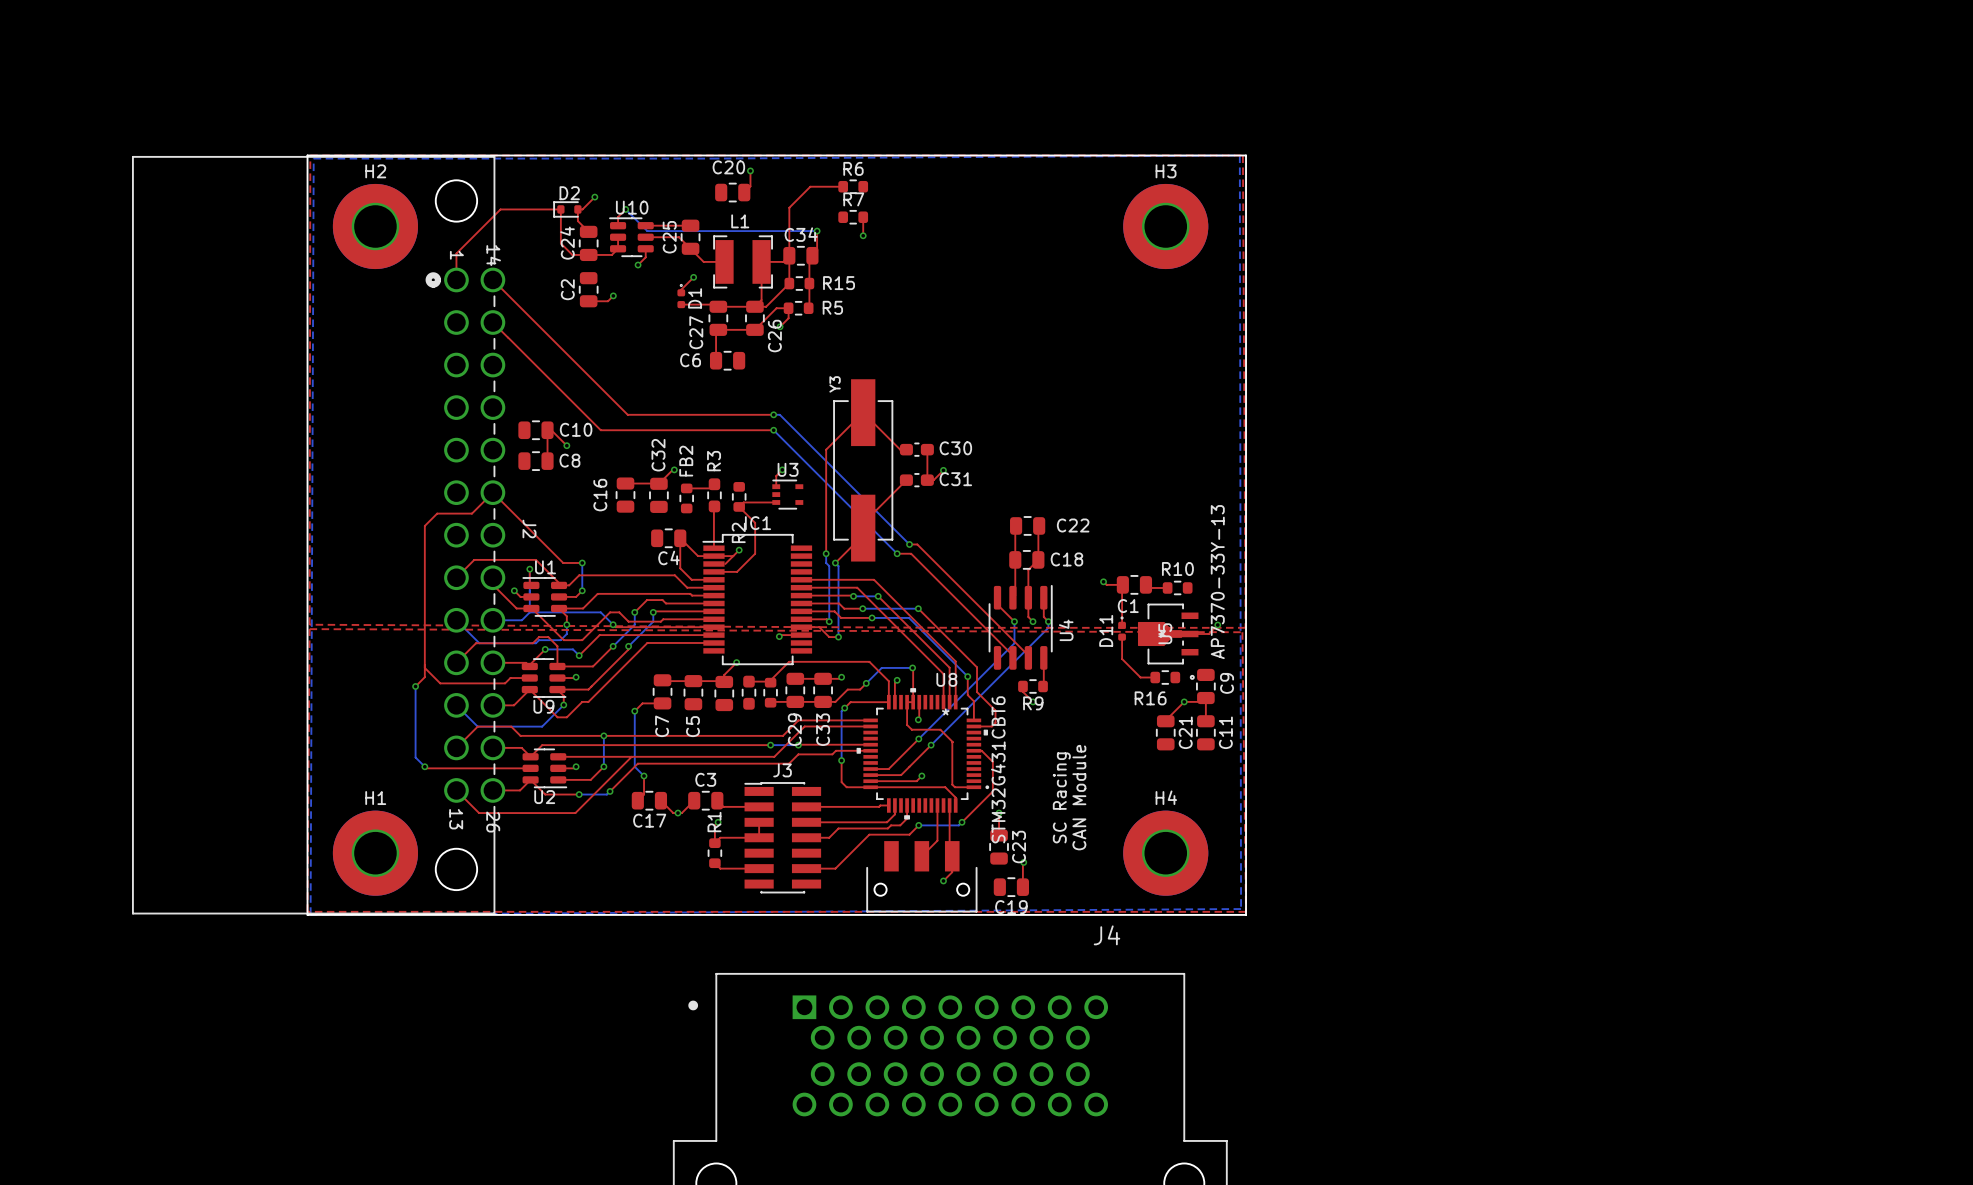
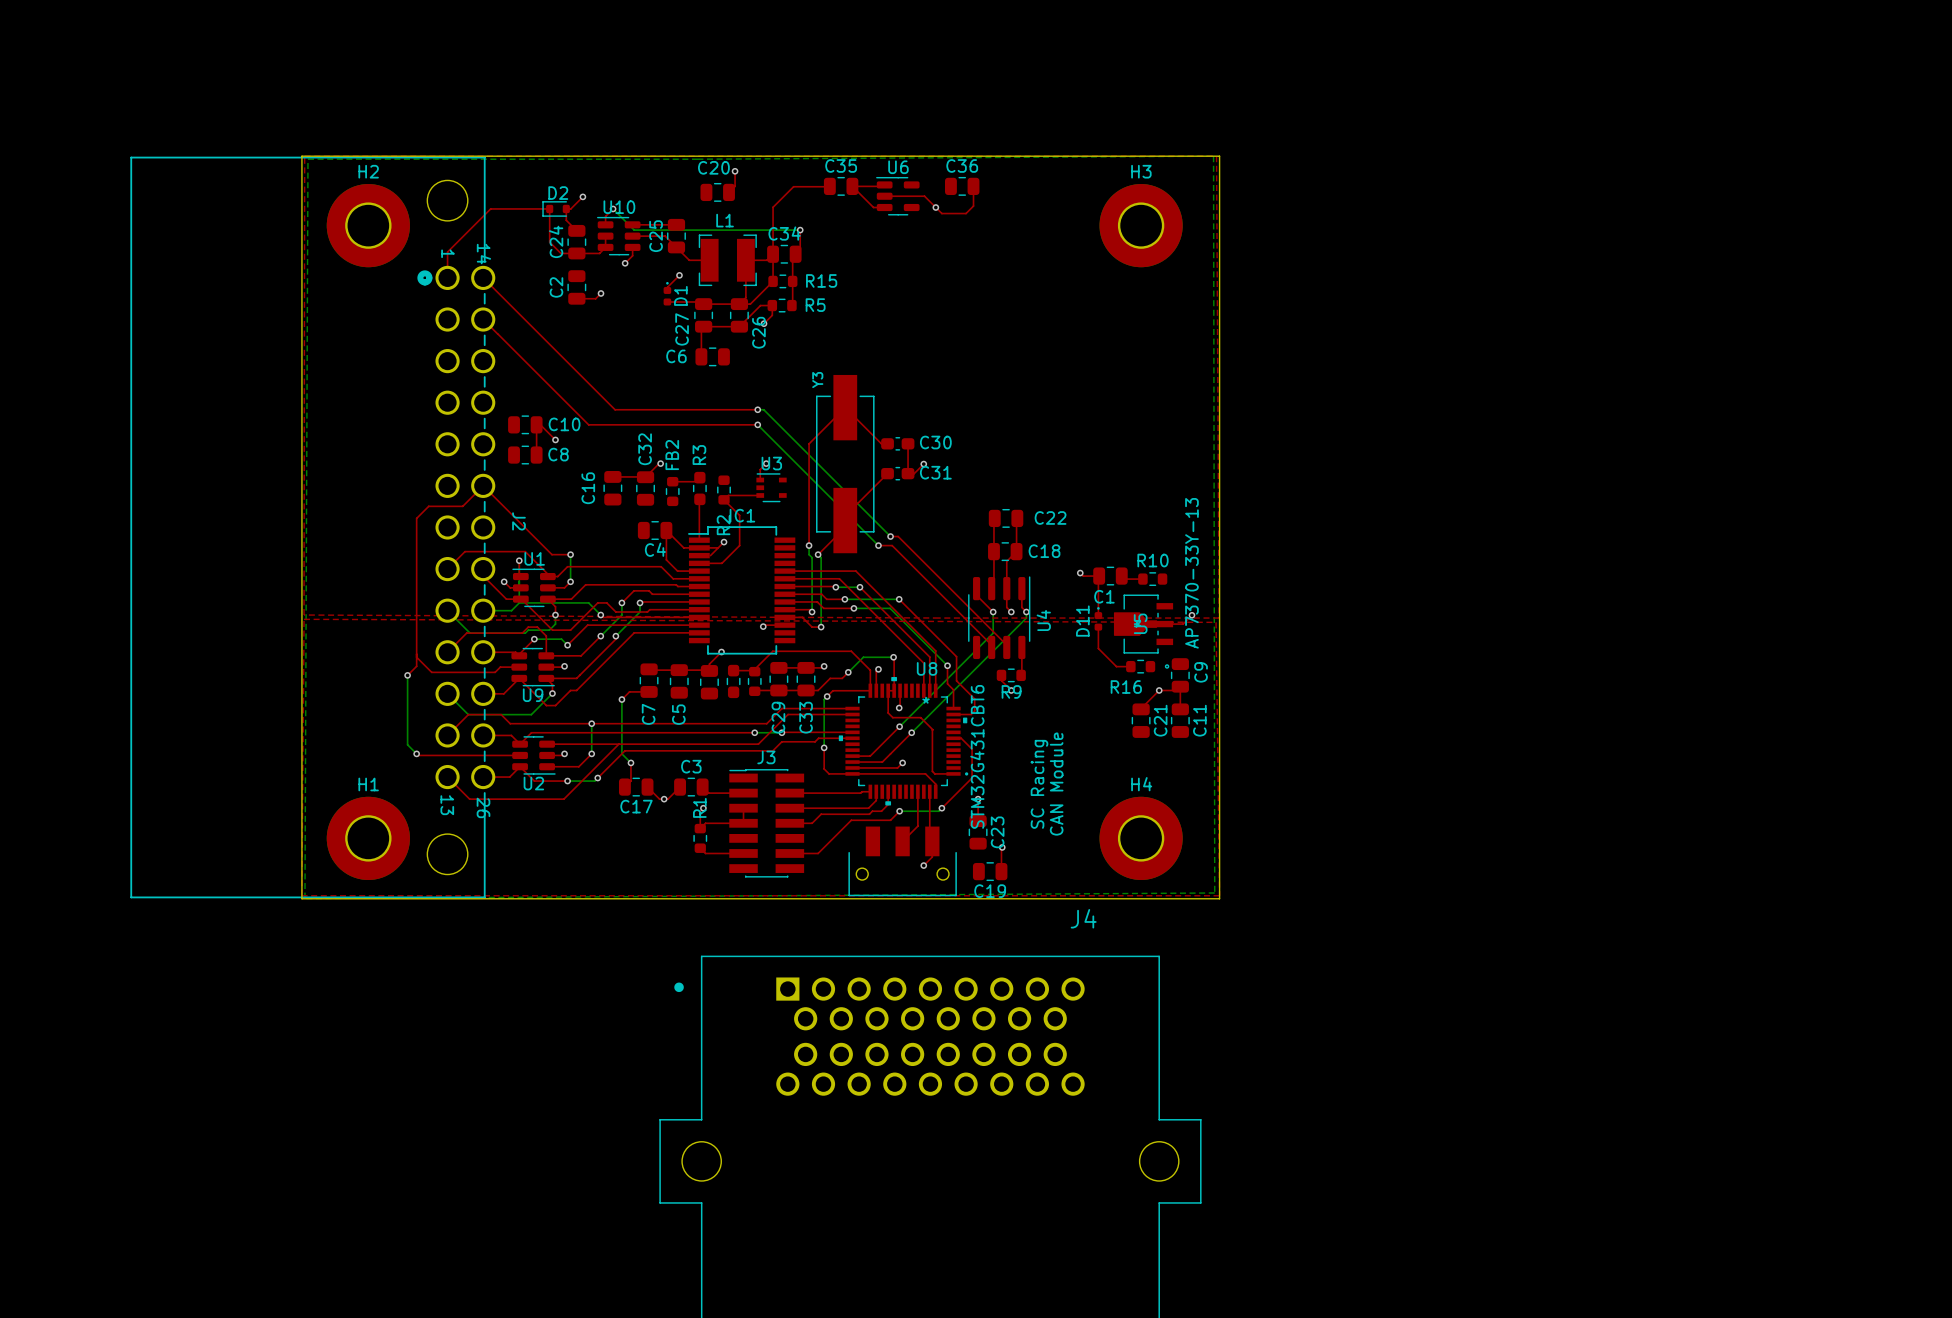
top track: none -> (884, 184) (852, 186) (873, 207) (884, 207)
R6: (853, 186) -> none
C35: none -> (841, 186)
C36: none -> (962, 186)
top track: none -> (973, 186) (973, 206) (966, 213) (941, 213) (924, 196) (884, 196)
U6: none -> (897, 196)
via: none -> (935, 207)
R7: (853, 217) -> none
top track: (863, 217) (863, 235) -> none
via: (863, 235) -> none

